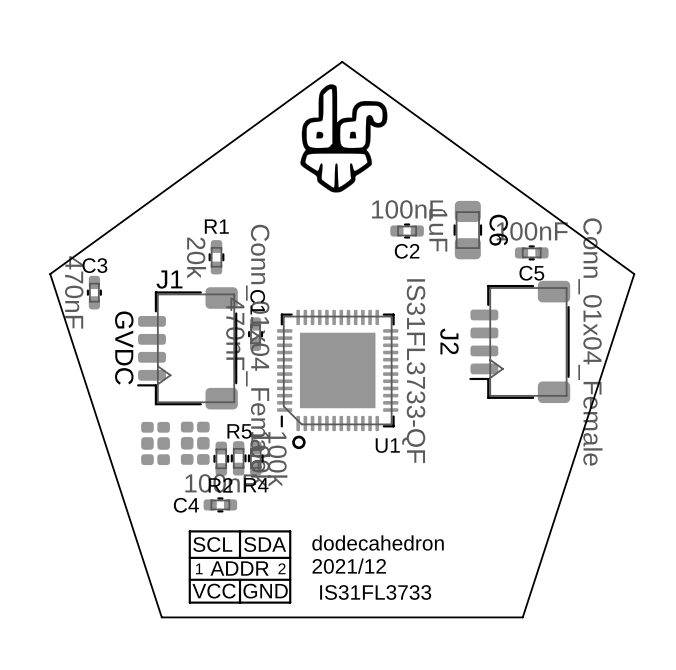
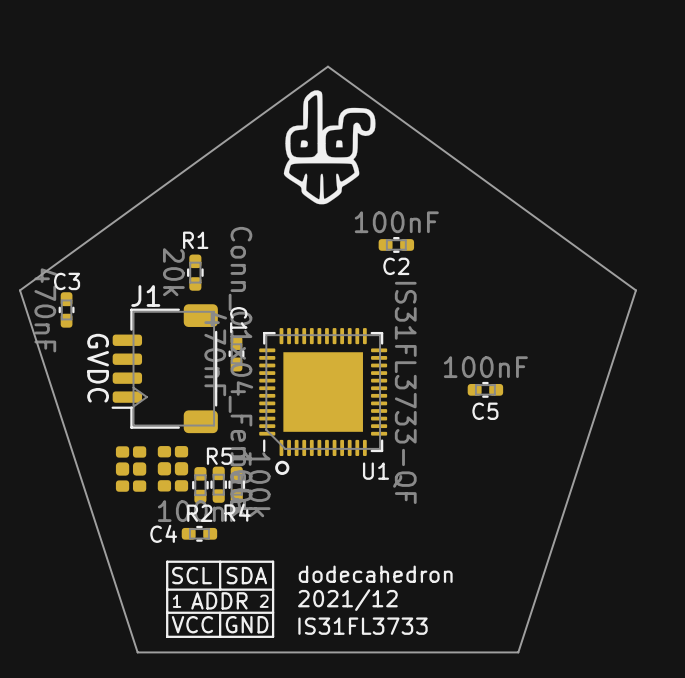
C6: 1uF (467, 230) -> none
C5 position: (531, 252) -> (485, 389)
J2: Conn_01x04_Female (519, 341) -> none

